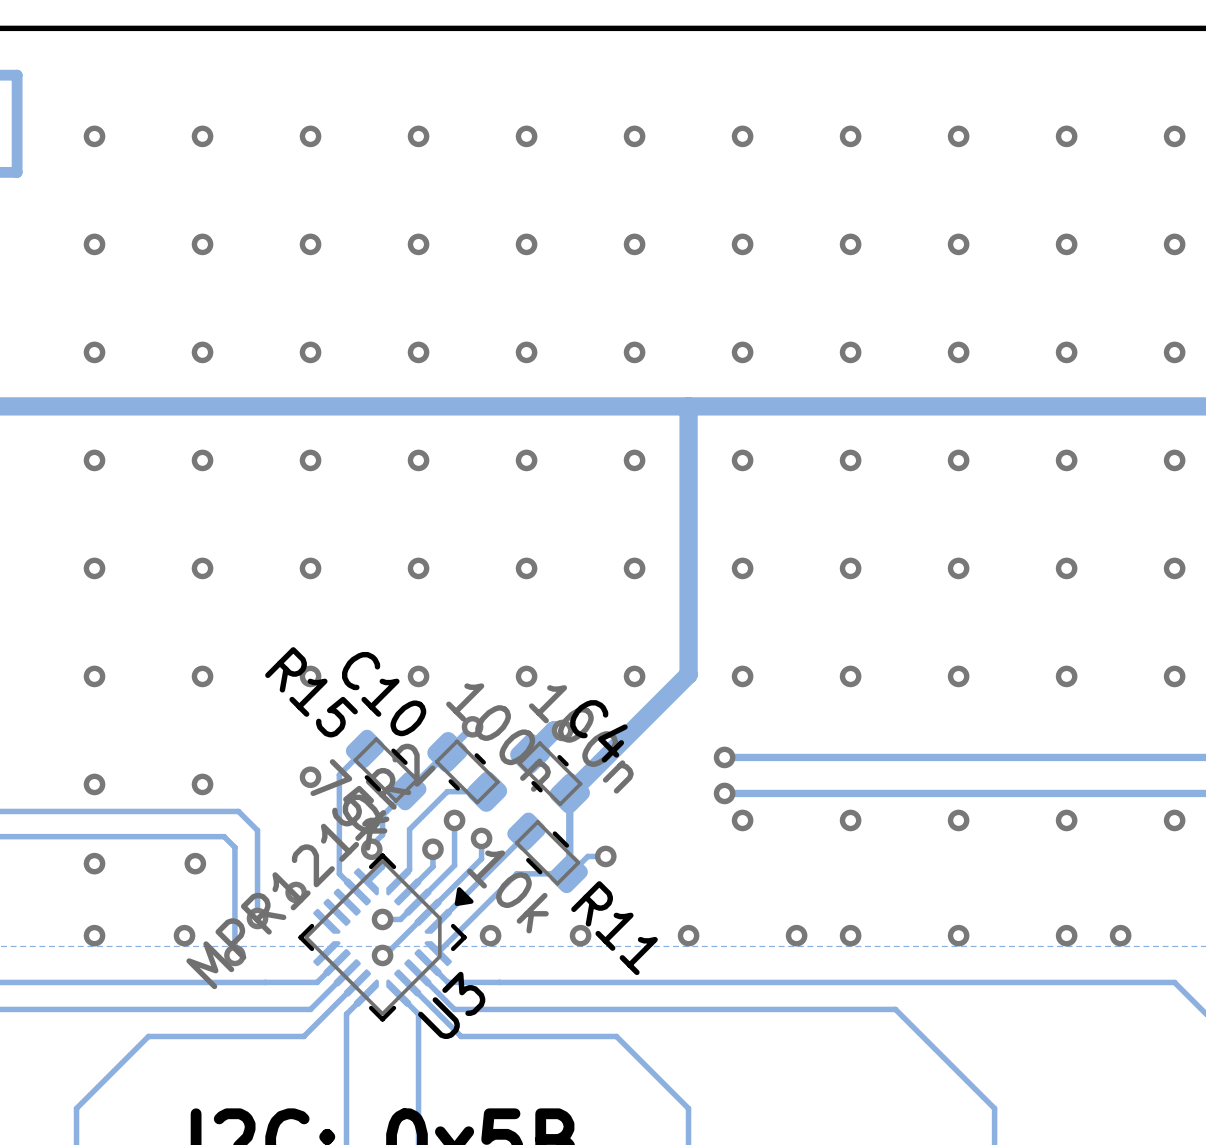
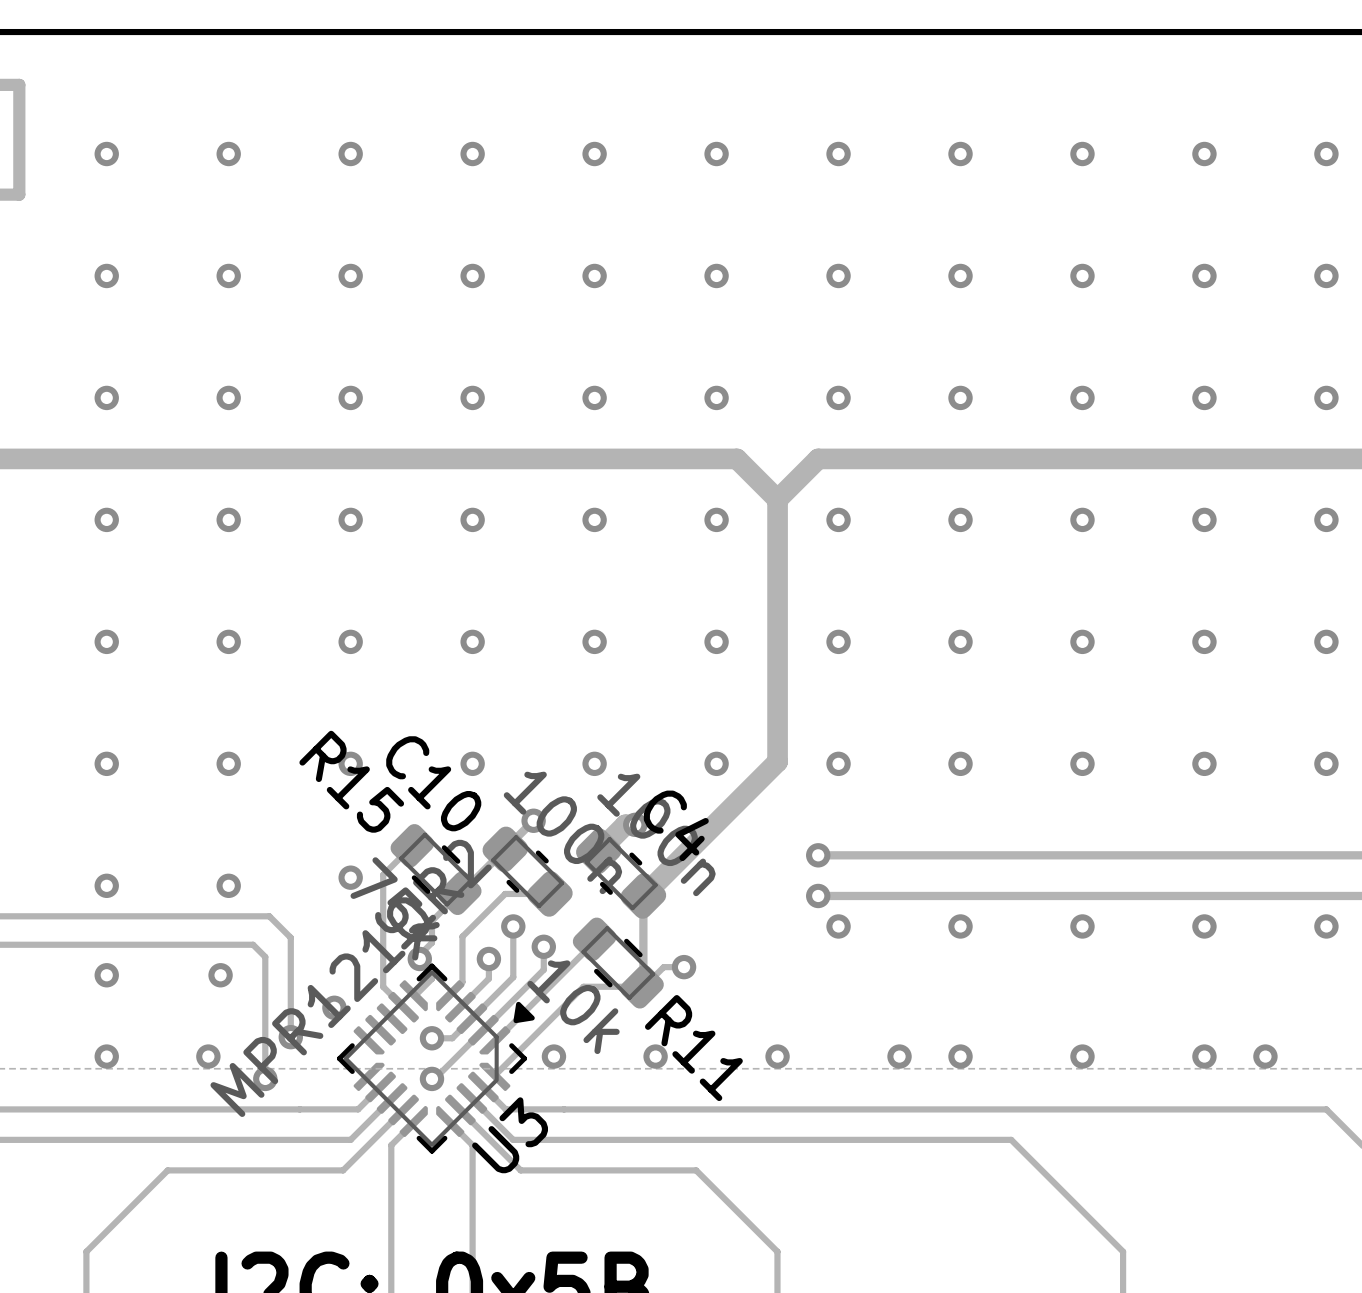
track: (688, 406) (688, 442) -> none
track: (724, 406) (652, 406) -> (818, 458) (777, 499) (736, 458)

